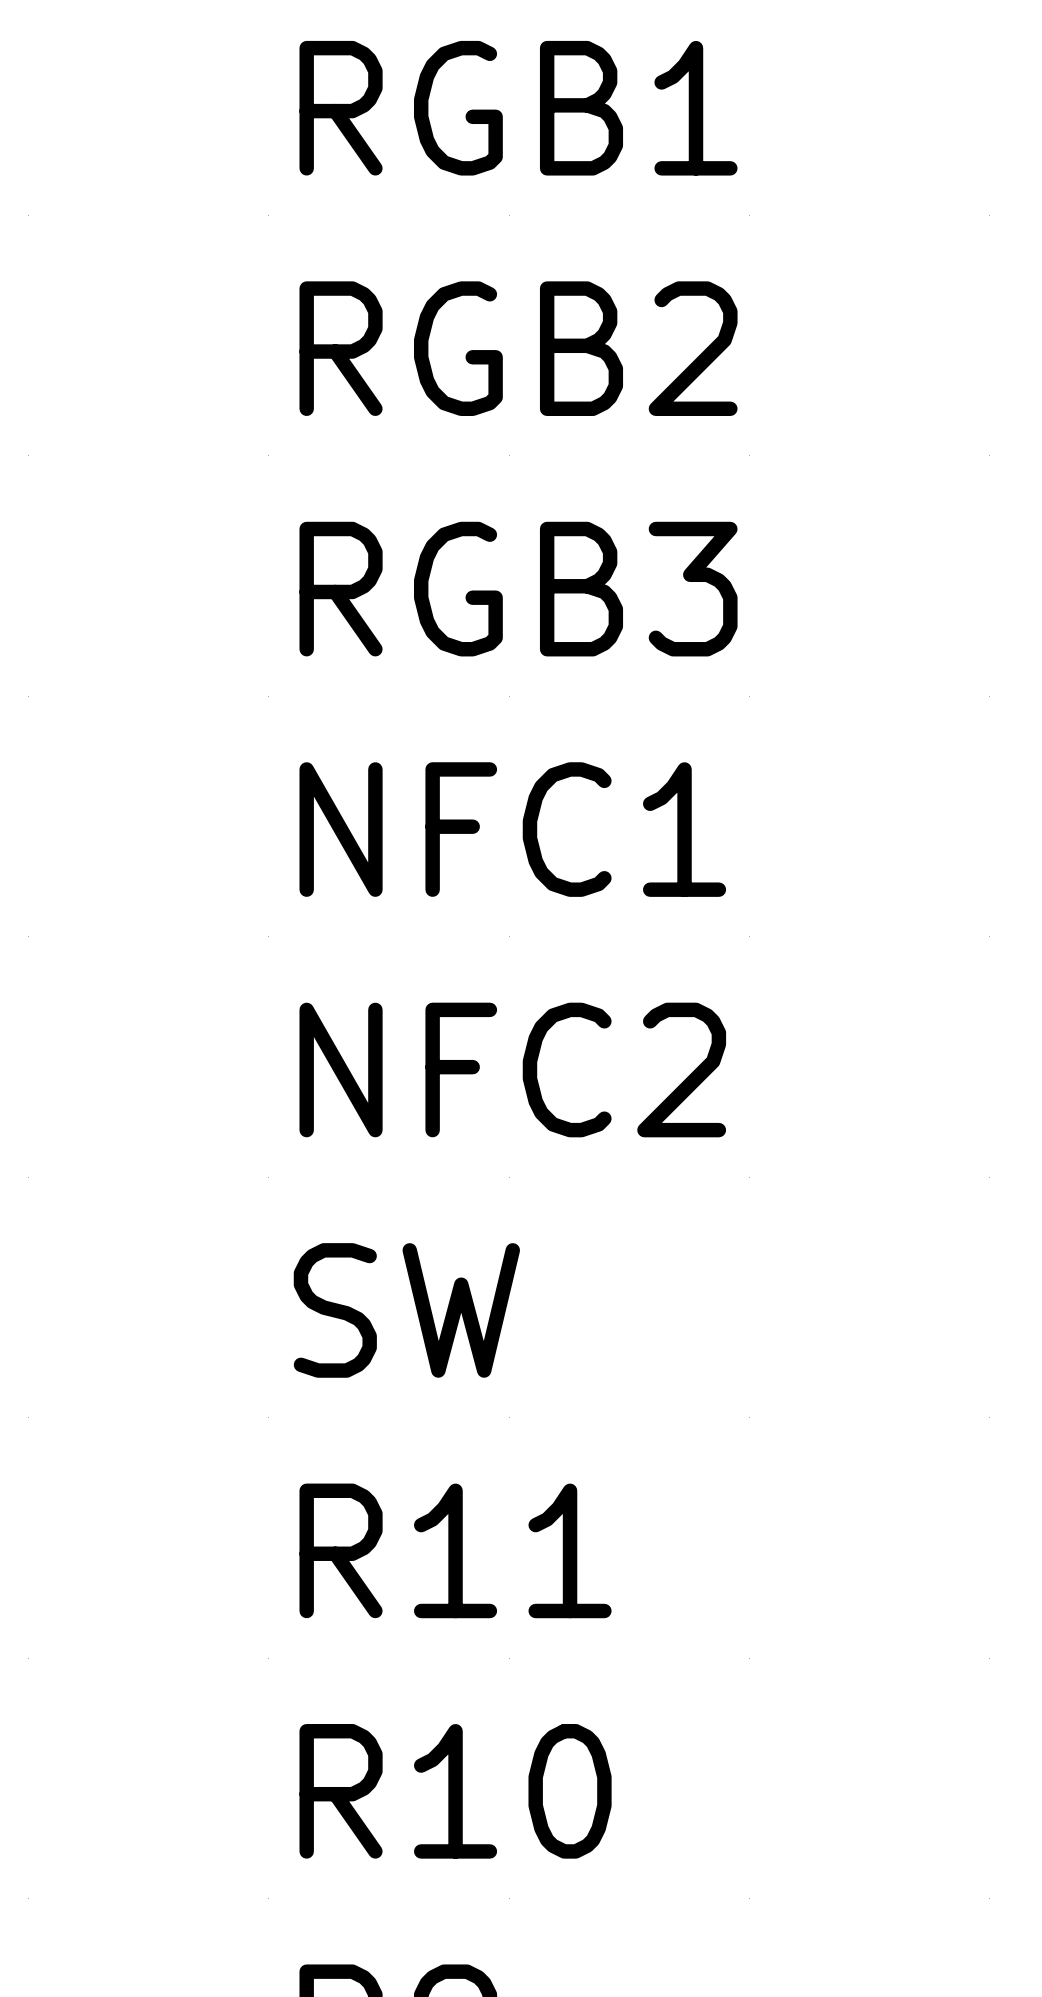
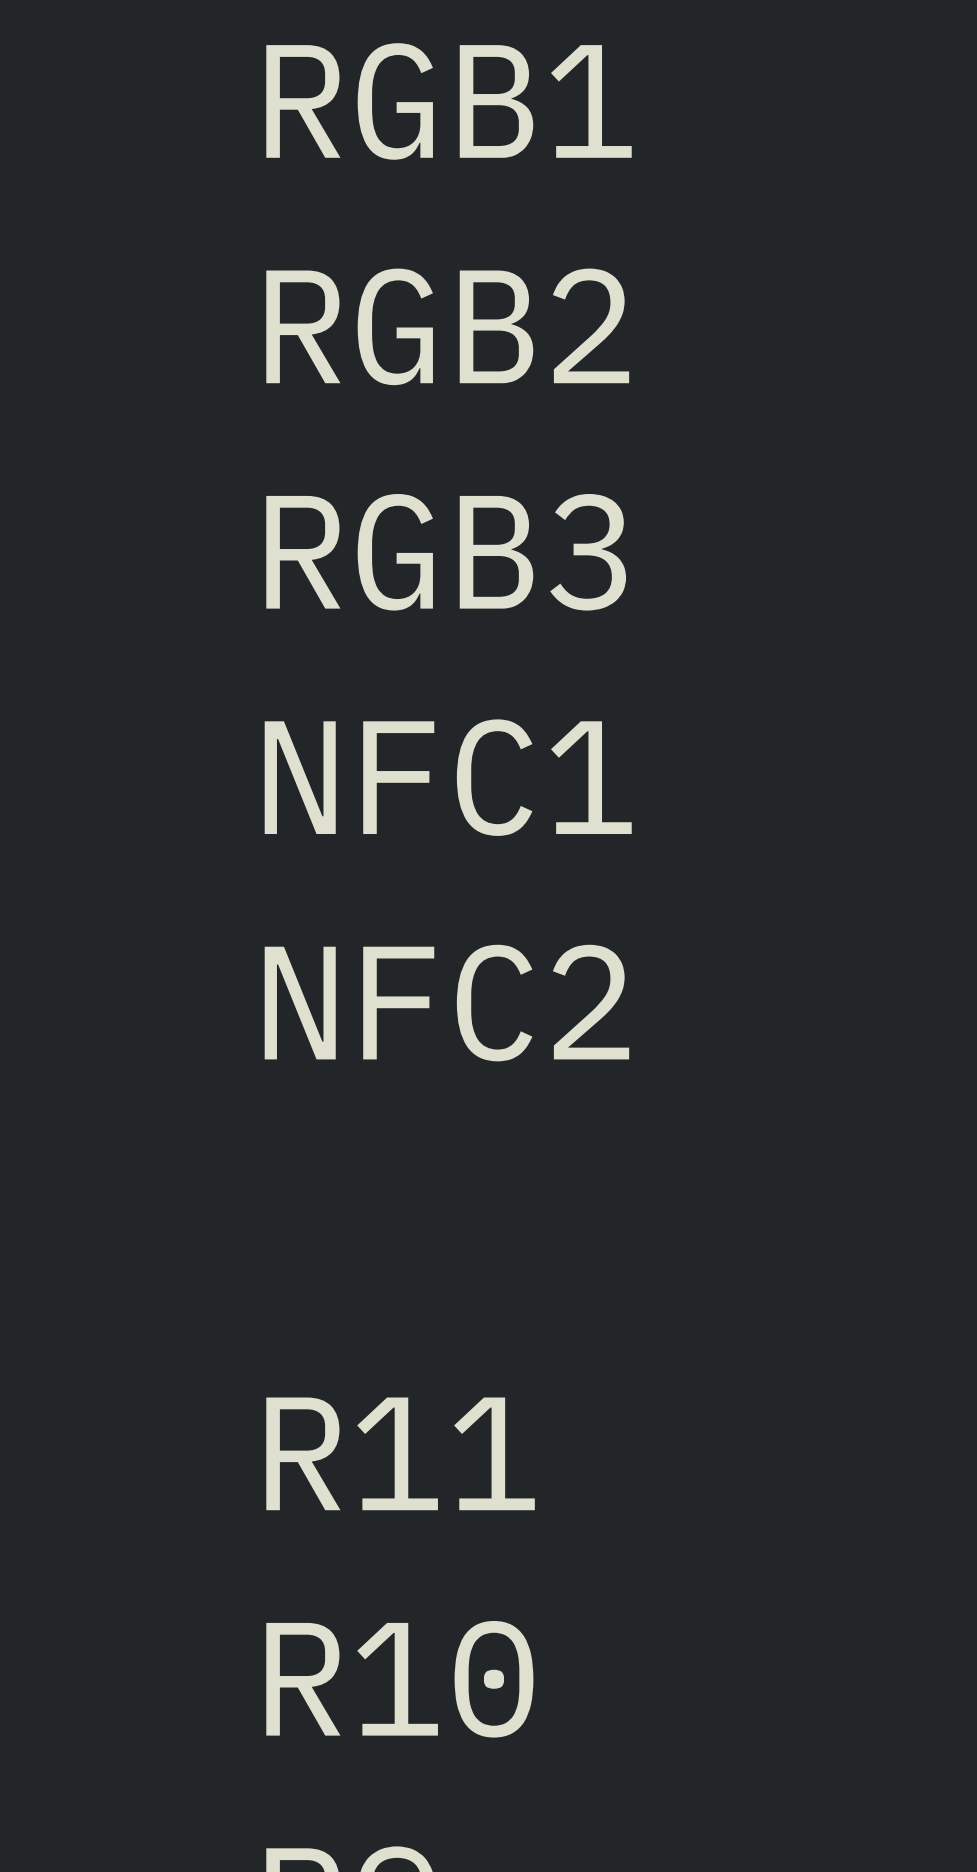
label: SW (406, 1310) -> none

